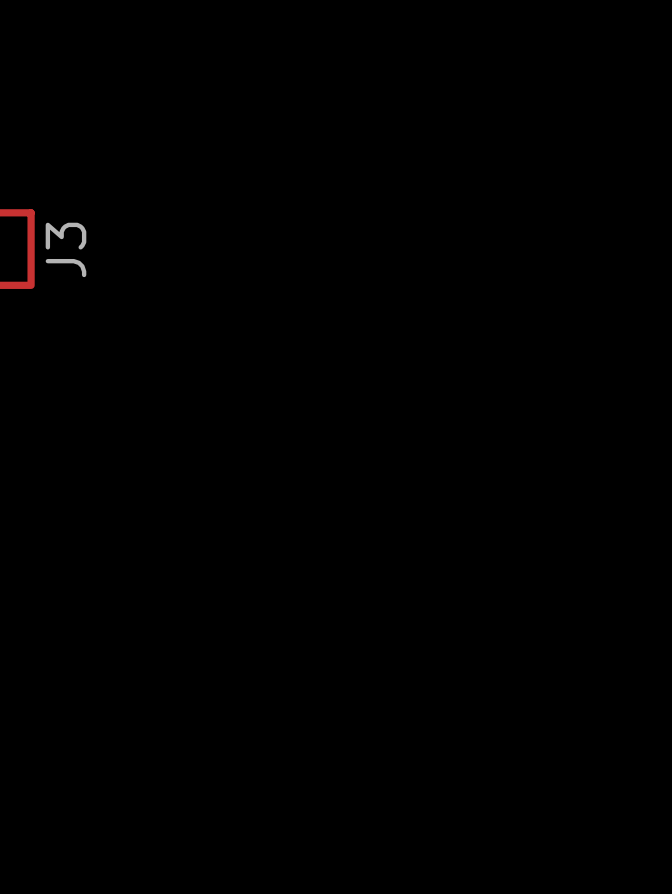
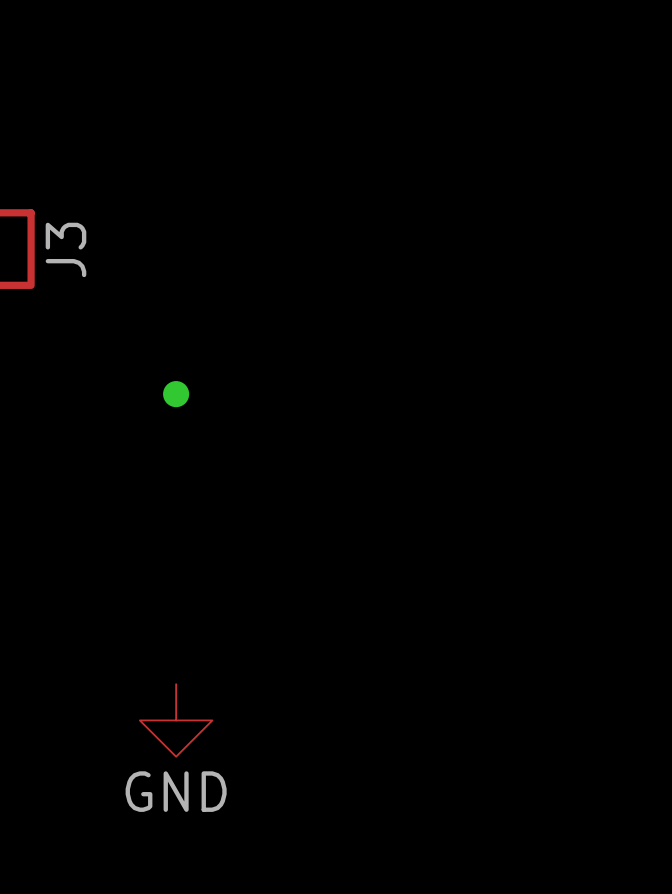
junction: none -> (176, 394)
power symbol: none -> GND (176, 720)

